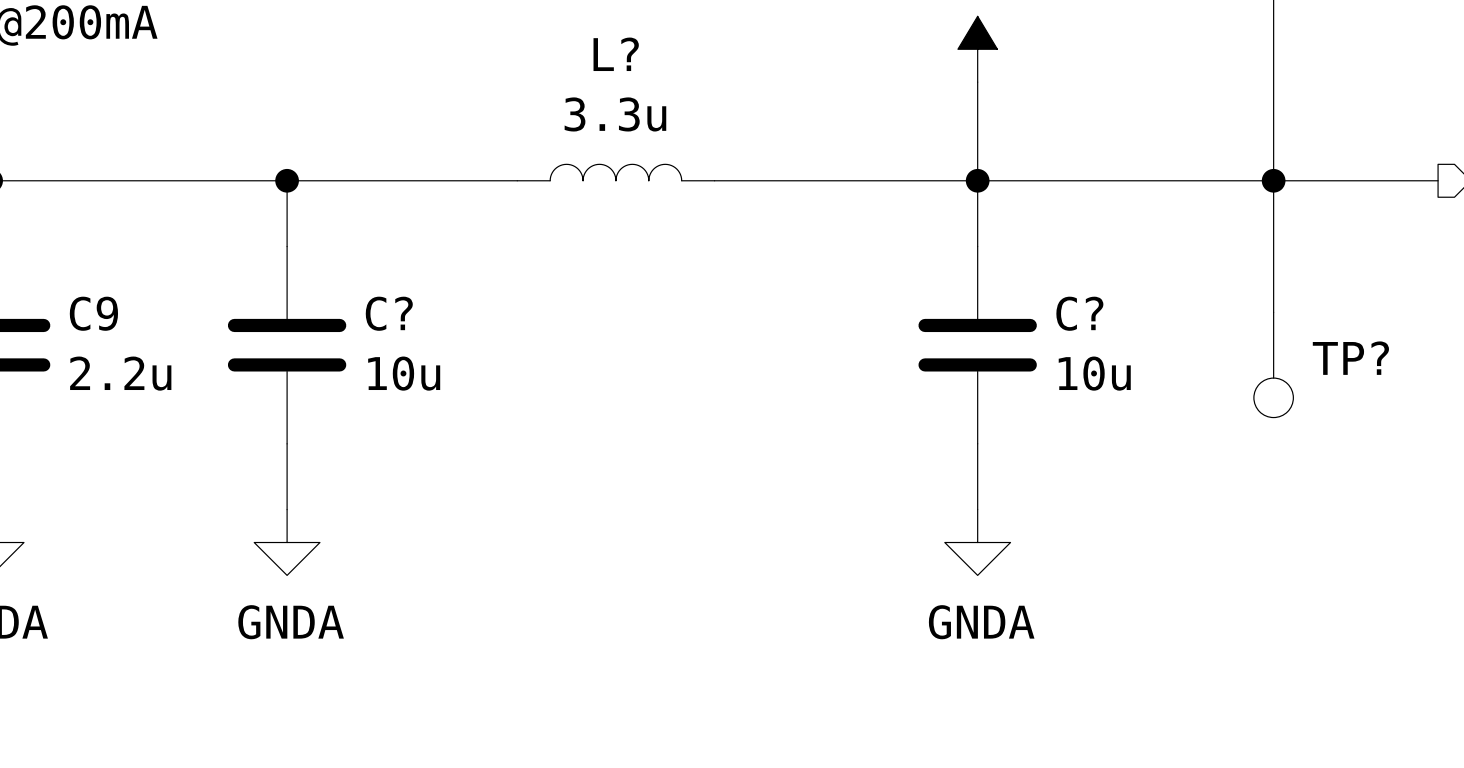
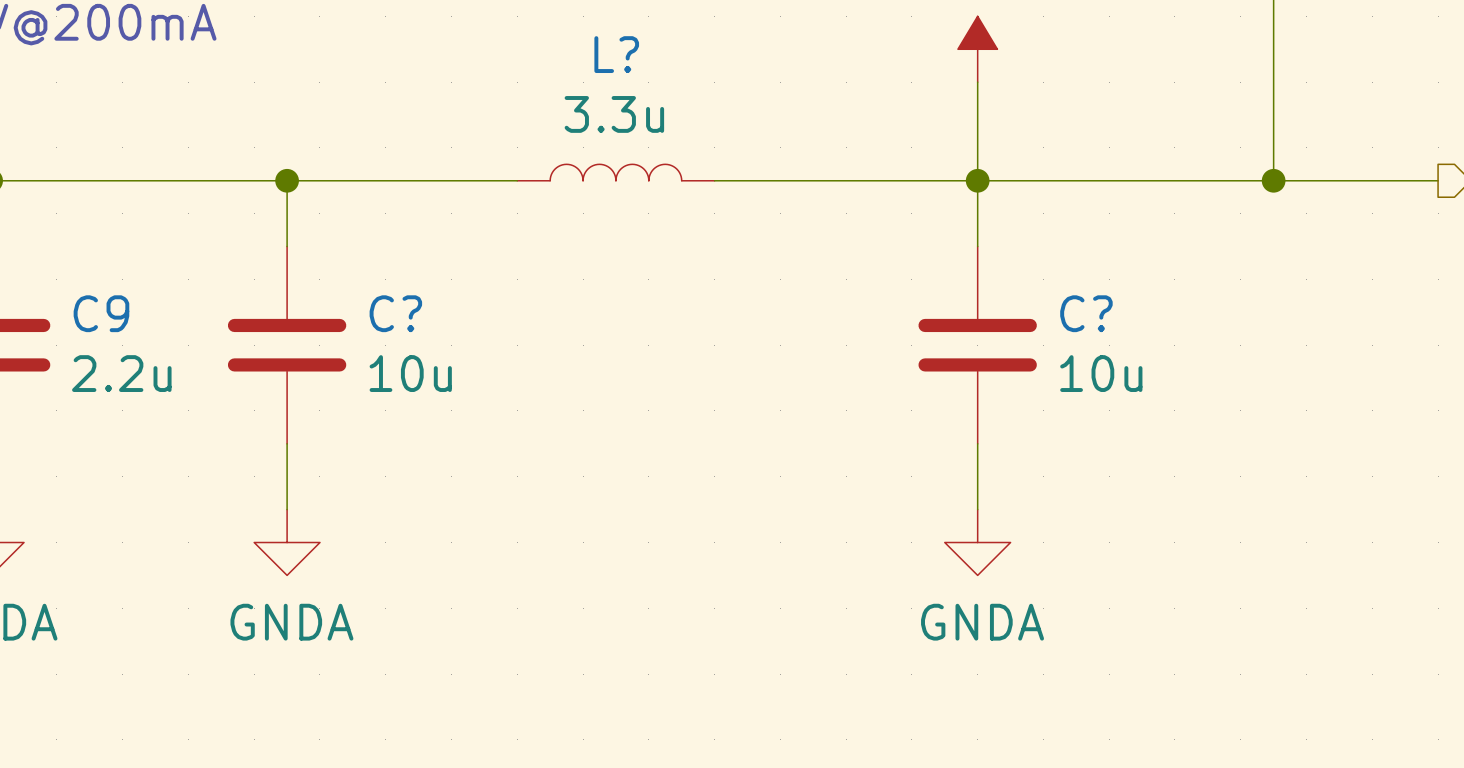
wire: (1273, 180) (1273, 312) -> none
TP?: (1273, 364) -> none

